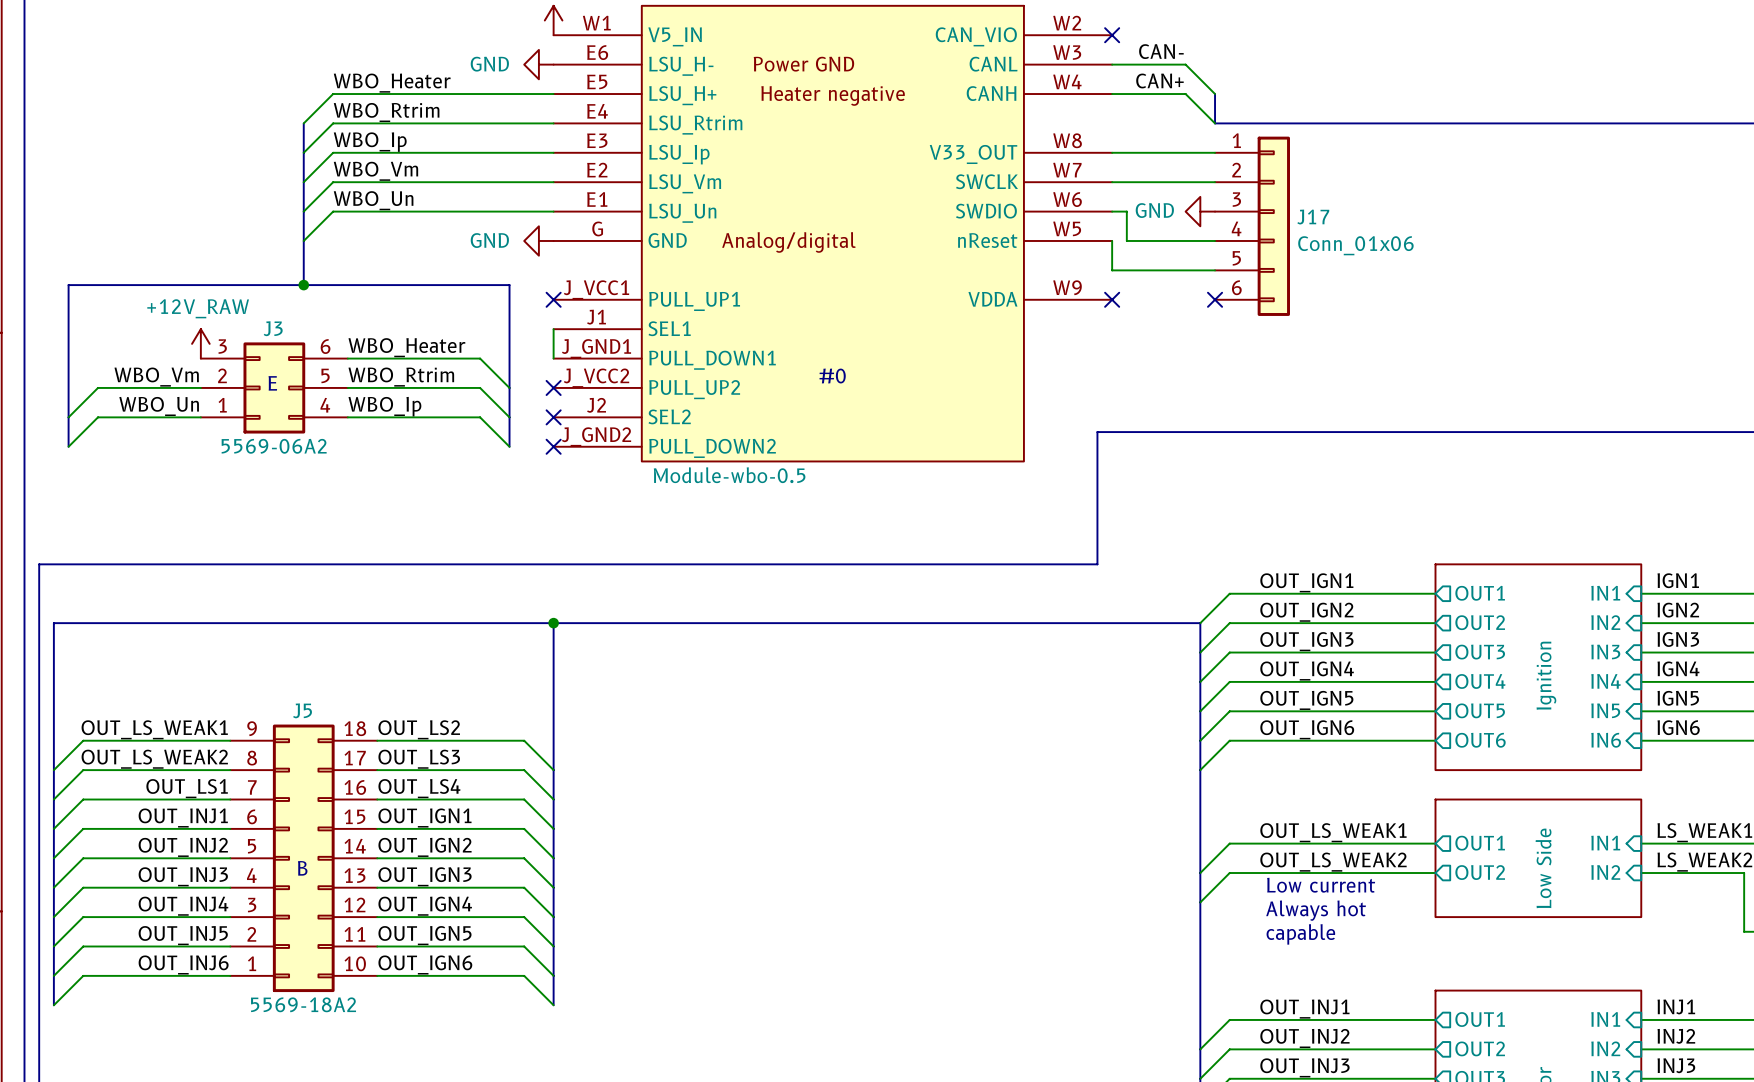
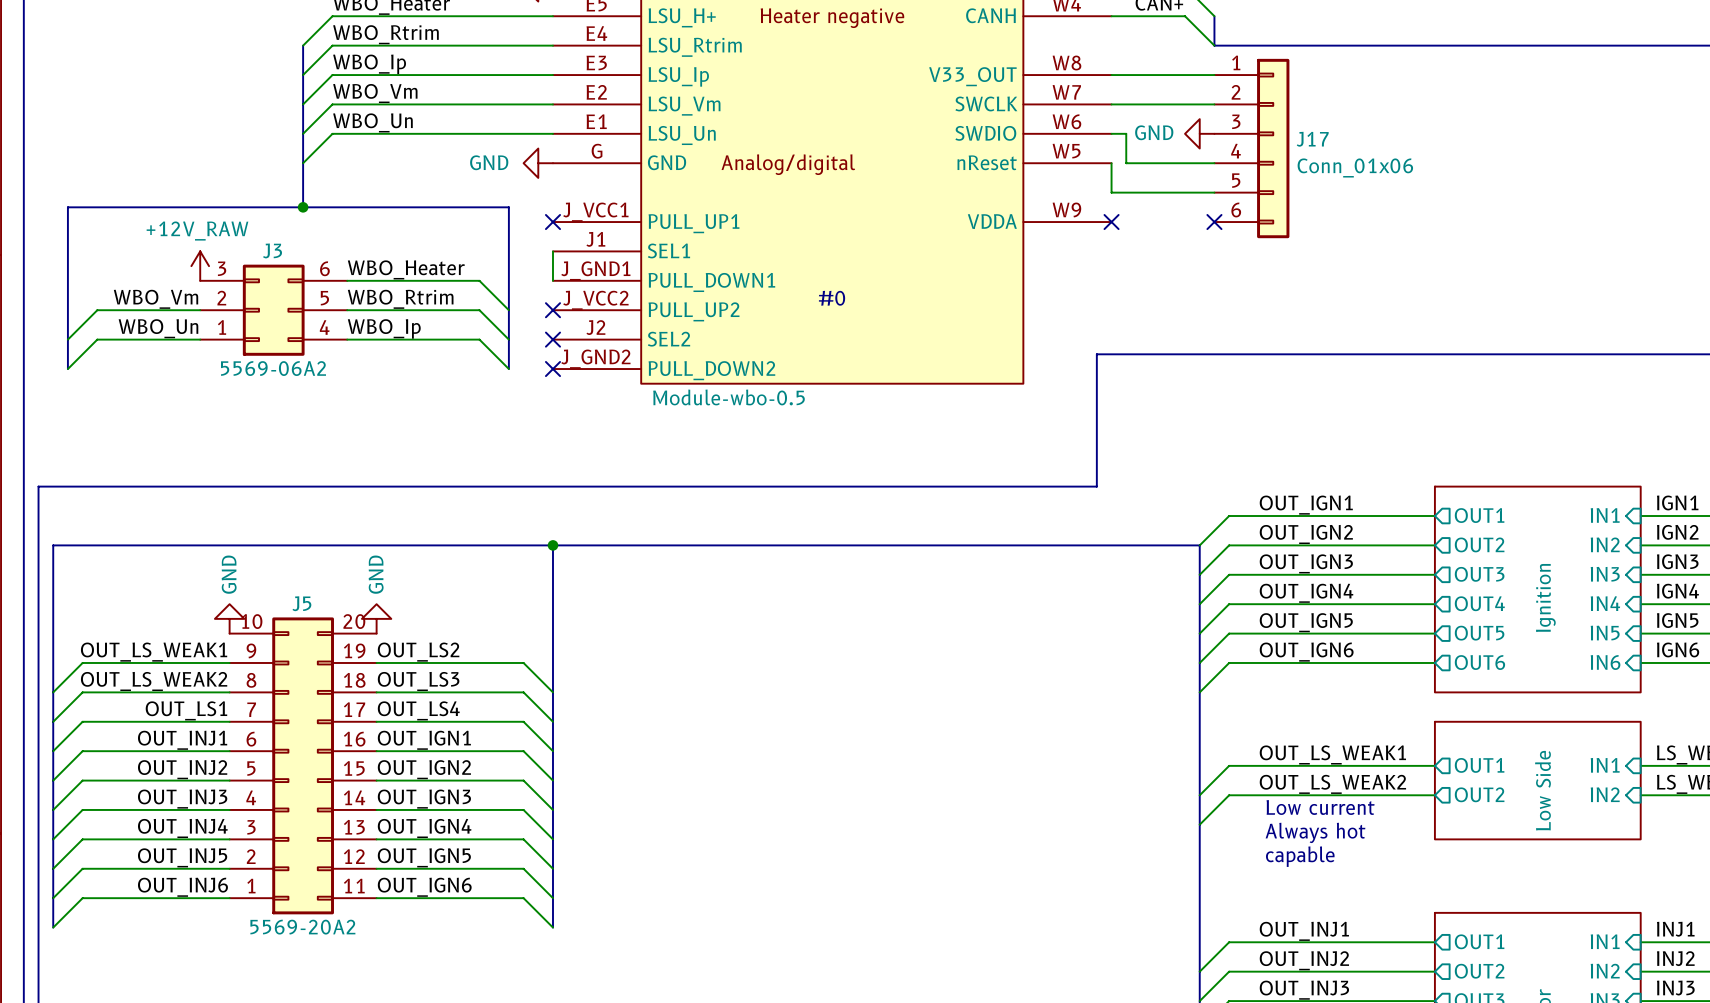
text: E (272, 383) -> none
power symbol: none -> GND (229, 618)
power symbol: none -> GND (376, 618)
J5 symbol: [230, 724, 378, 993] -> [229, 617, 377, 915]
text: B (302, 868) -> none
J5 value: 5569-18A2 (303, 1004) -> 5569-20A2 (302, 927)

